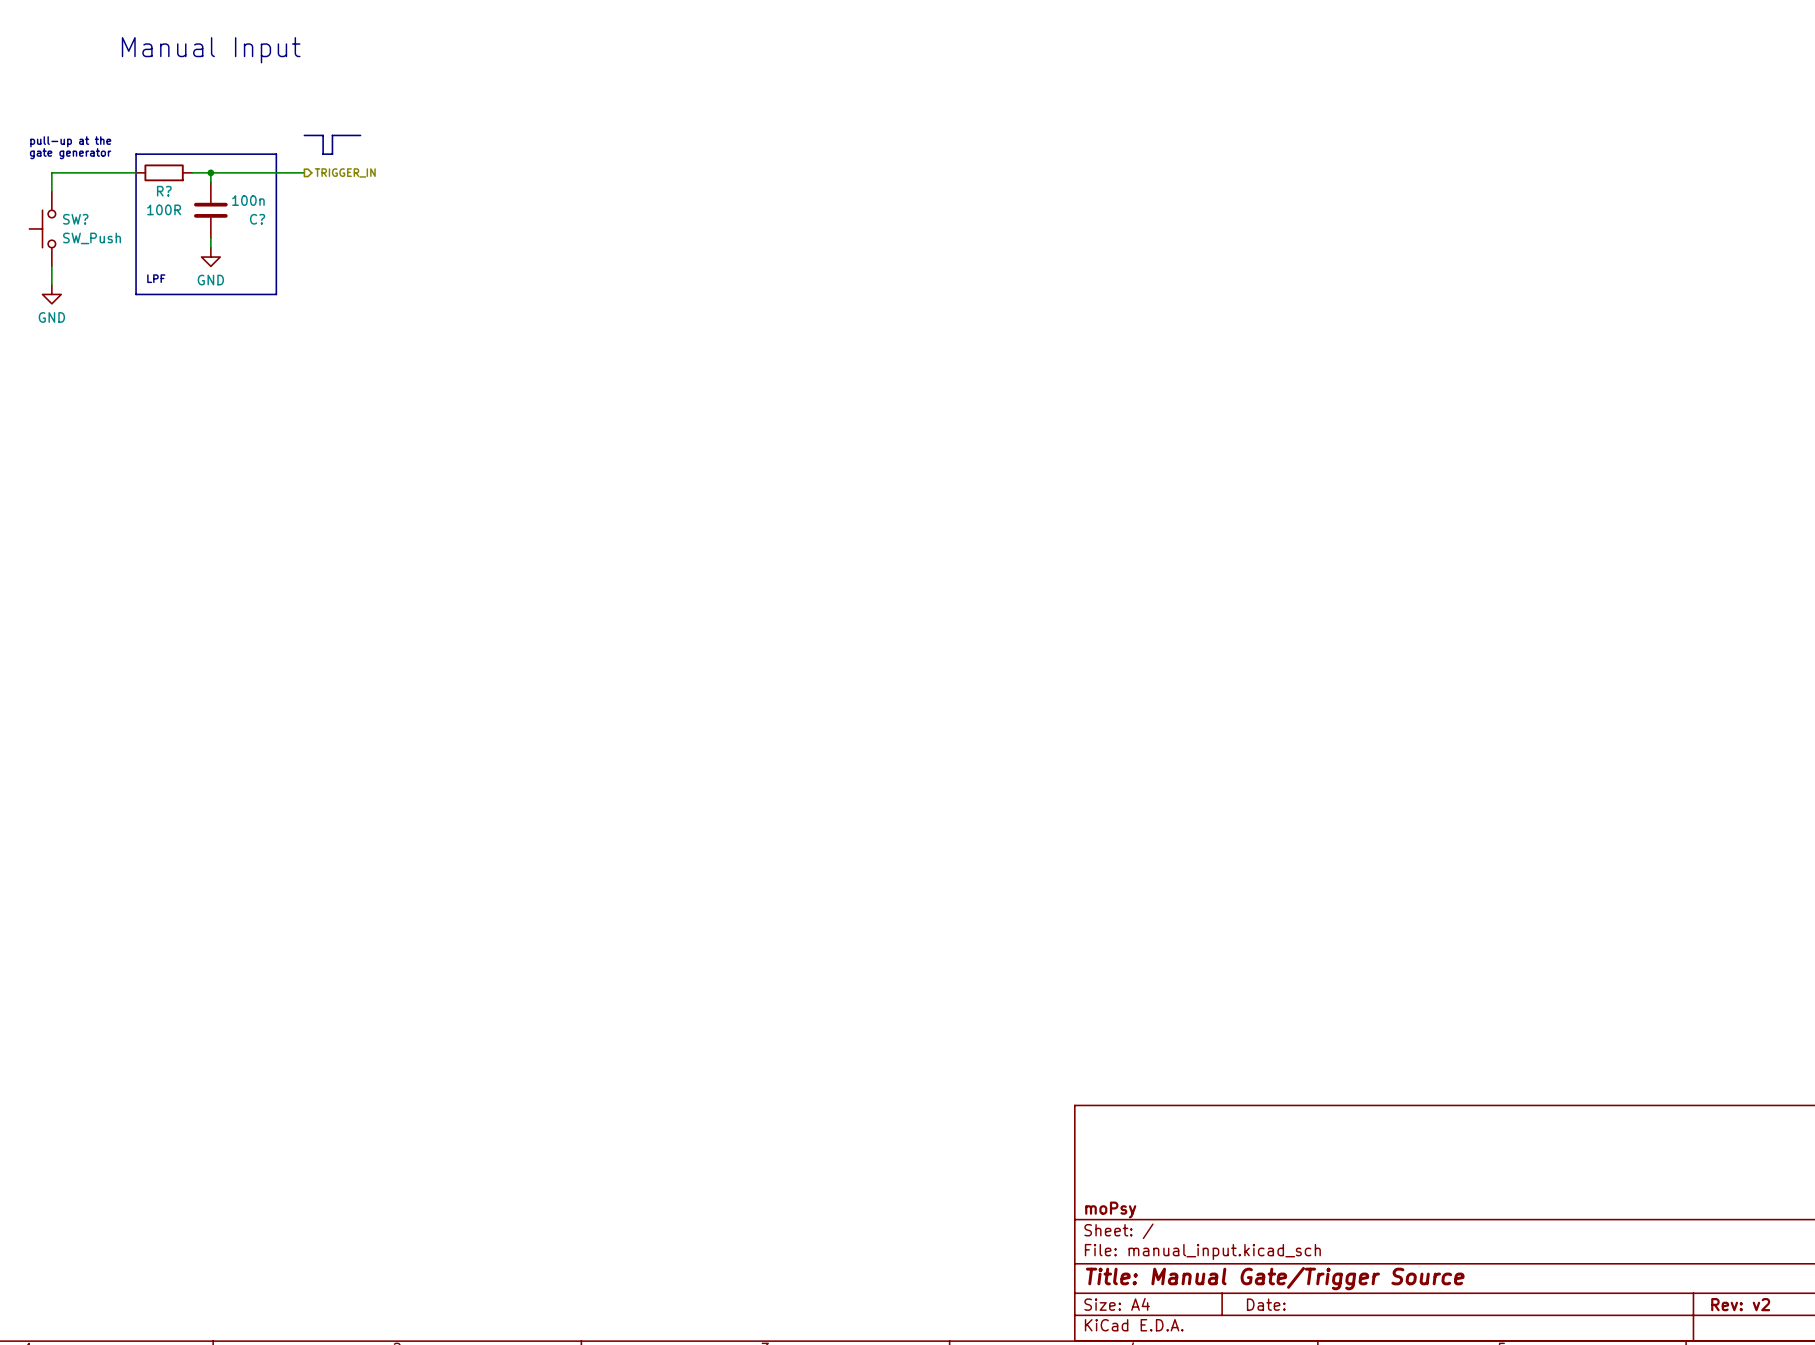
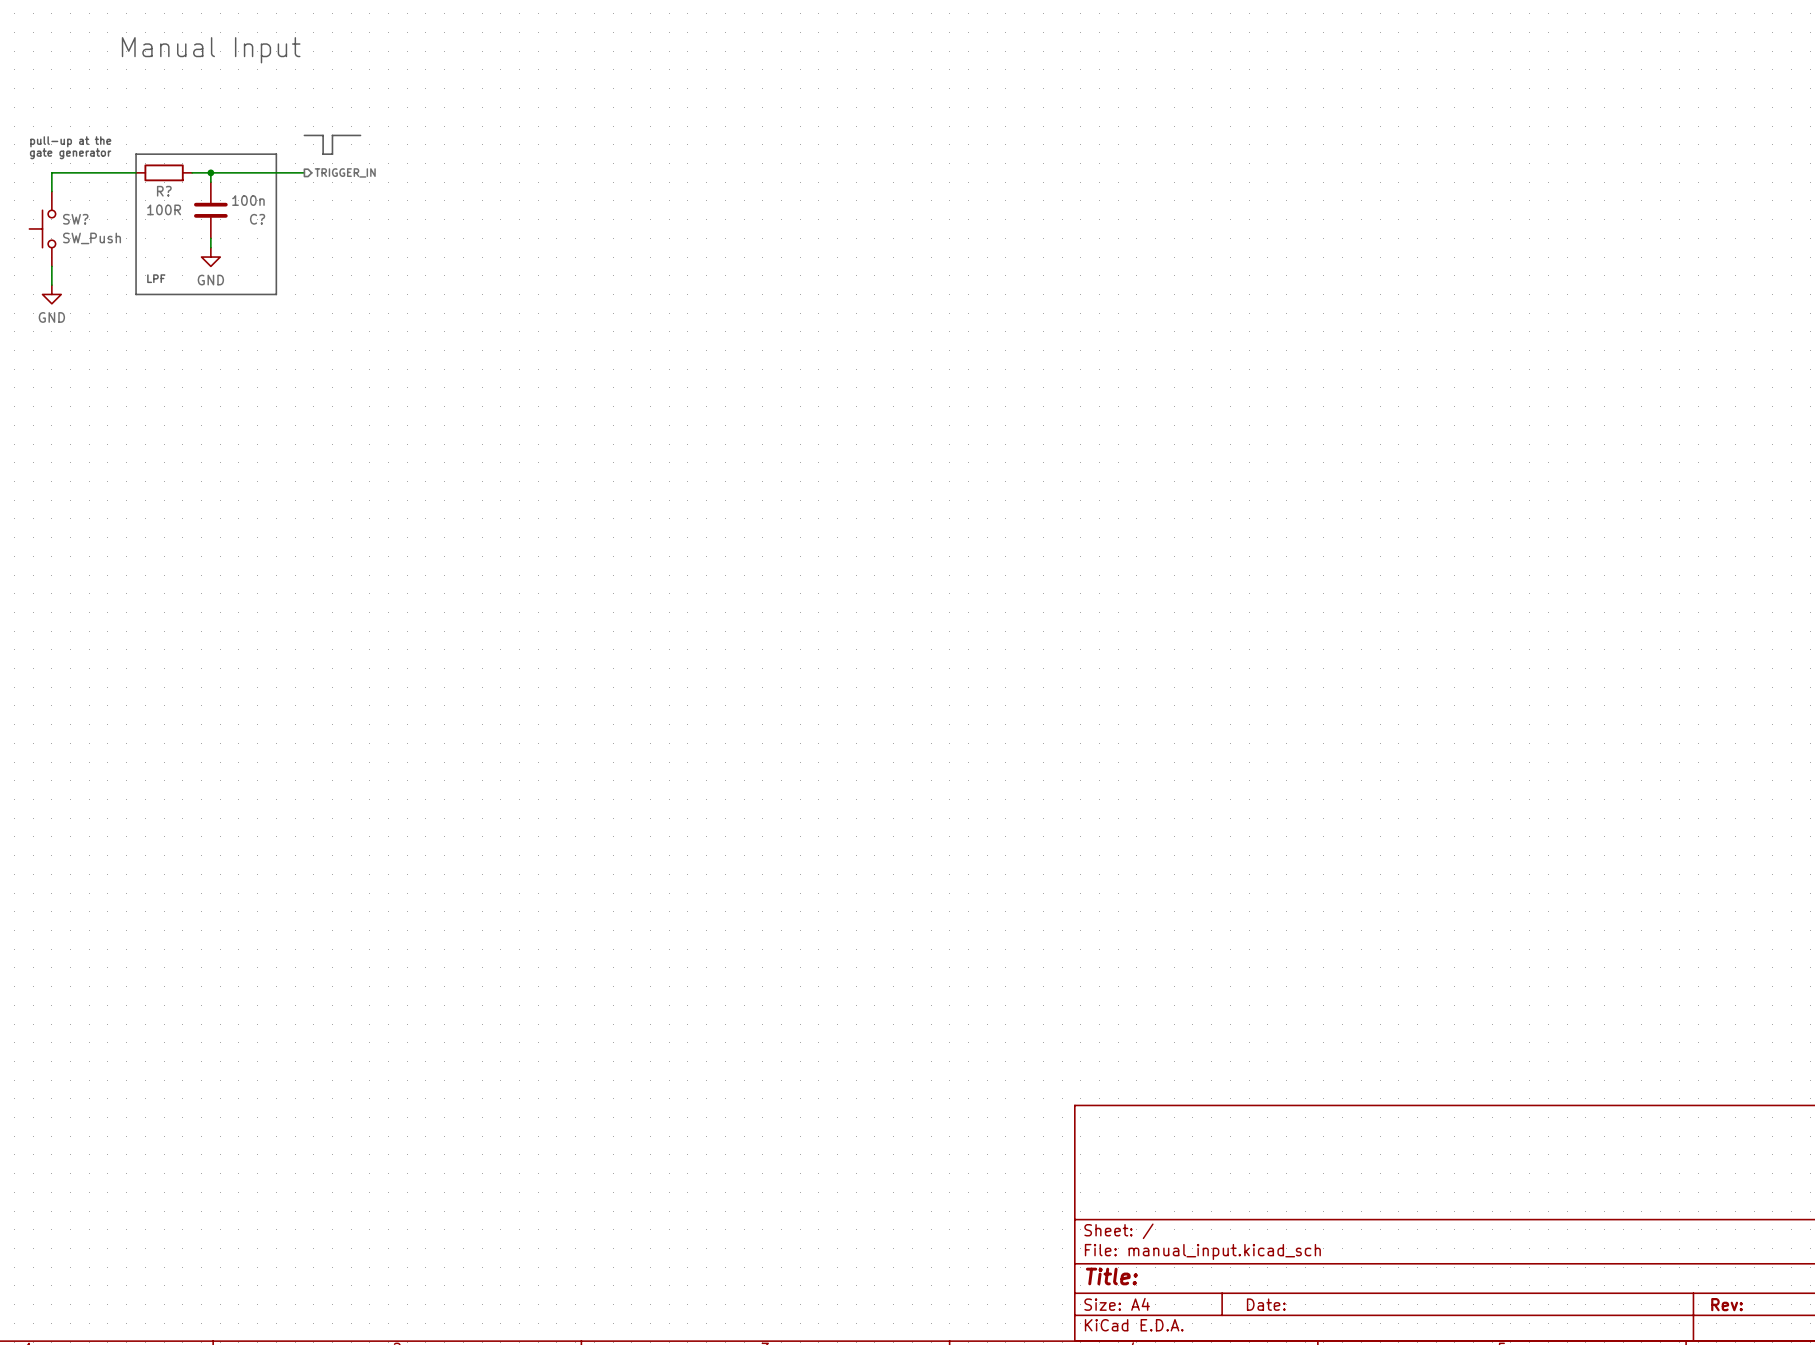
title block: moPsy (1110, 1209) -> none
title block: Title: Manual Gate/Trigger Source (1275, 1278) -> Title: (1111, 1276)
title block: Rev: v2 (1740, 1304) -> Rev: (1727, 1304)

